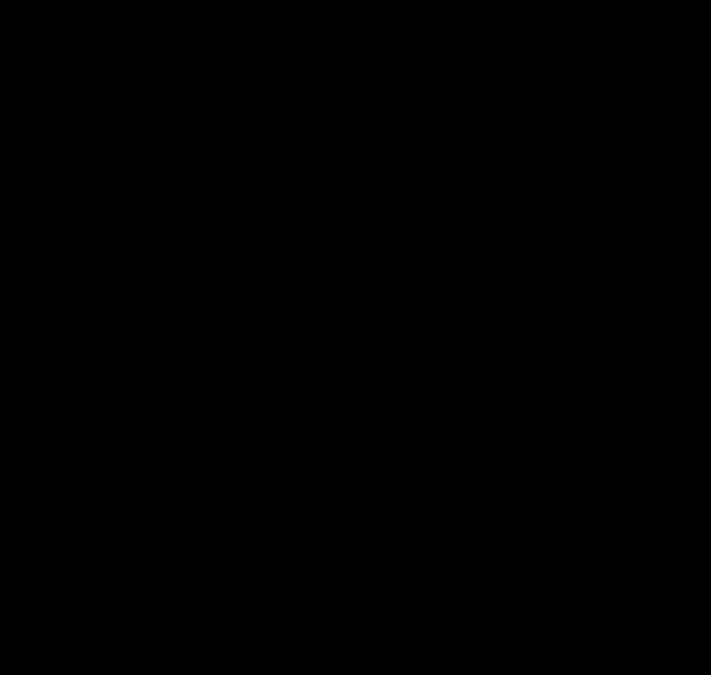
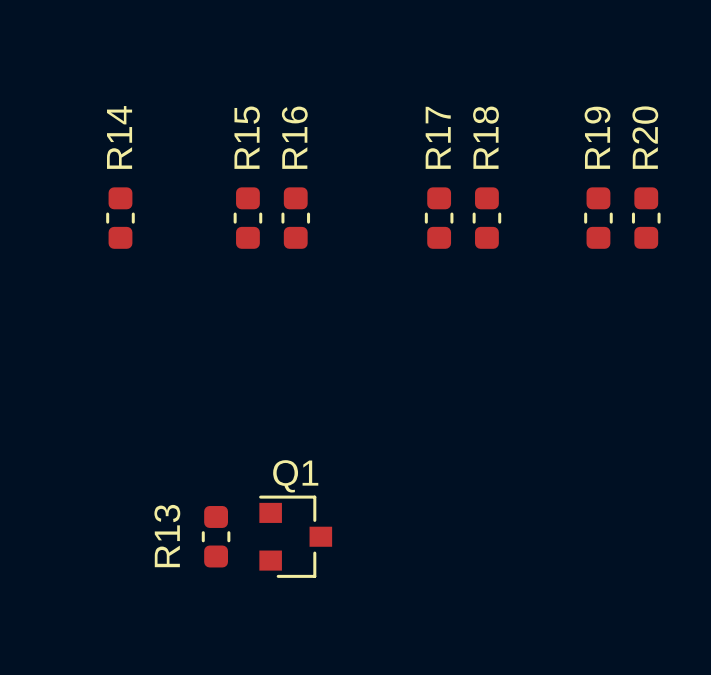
R14: none -> (120, 218)
R15: none -> (247, 218)
R16: none -> (295, 218)
R17: none -> (439, 218)
R18: none -> (486, 218)
R19: none -> (598, 218)
R20: none -> (646, 218)
R13: none -> (216, 536)
Q1: none -> (295, 536)

